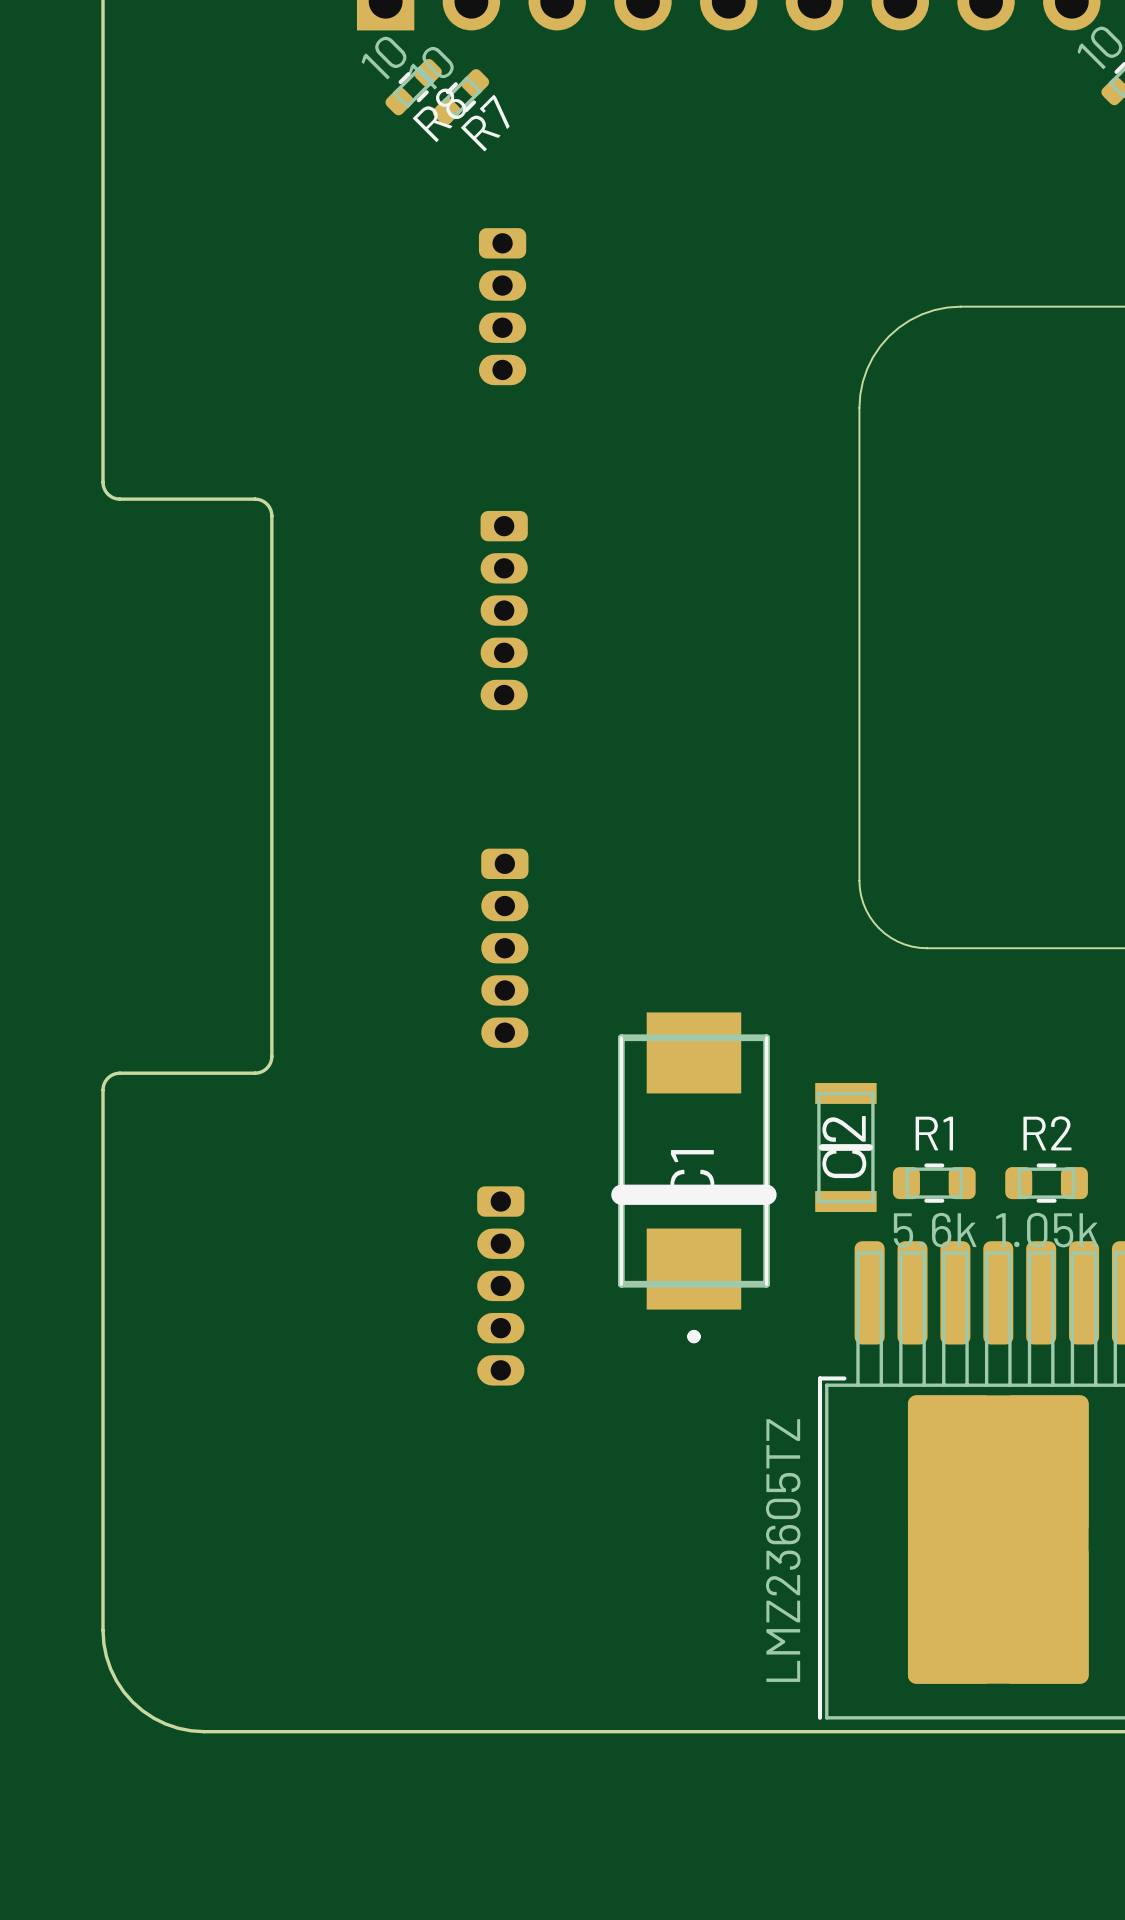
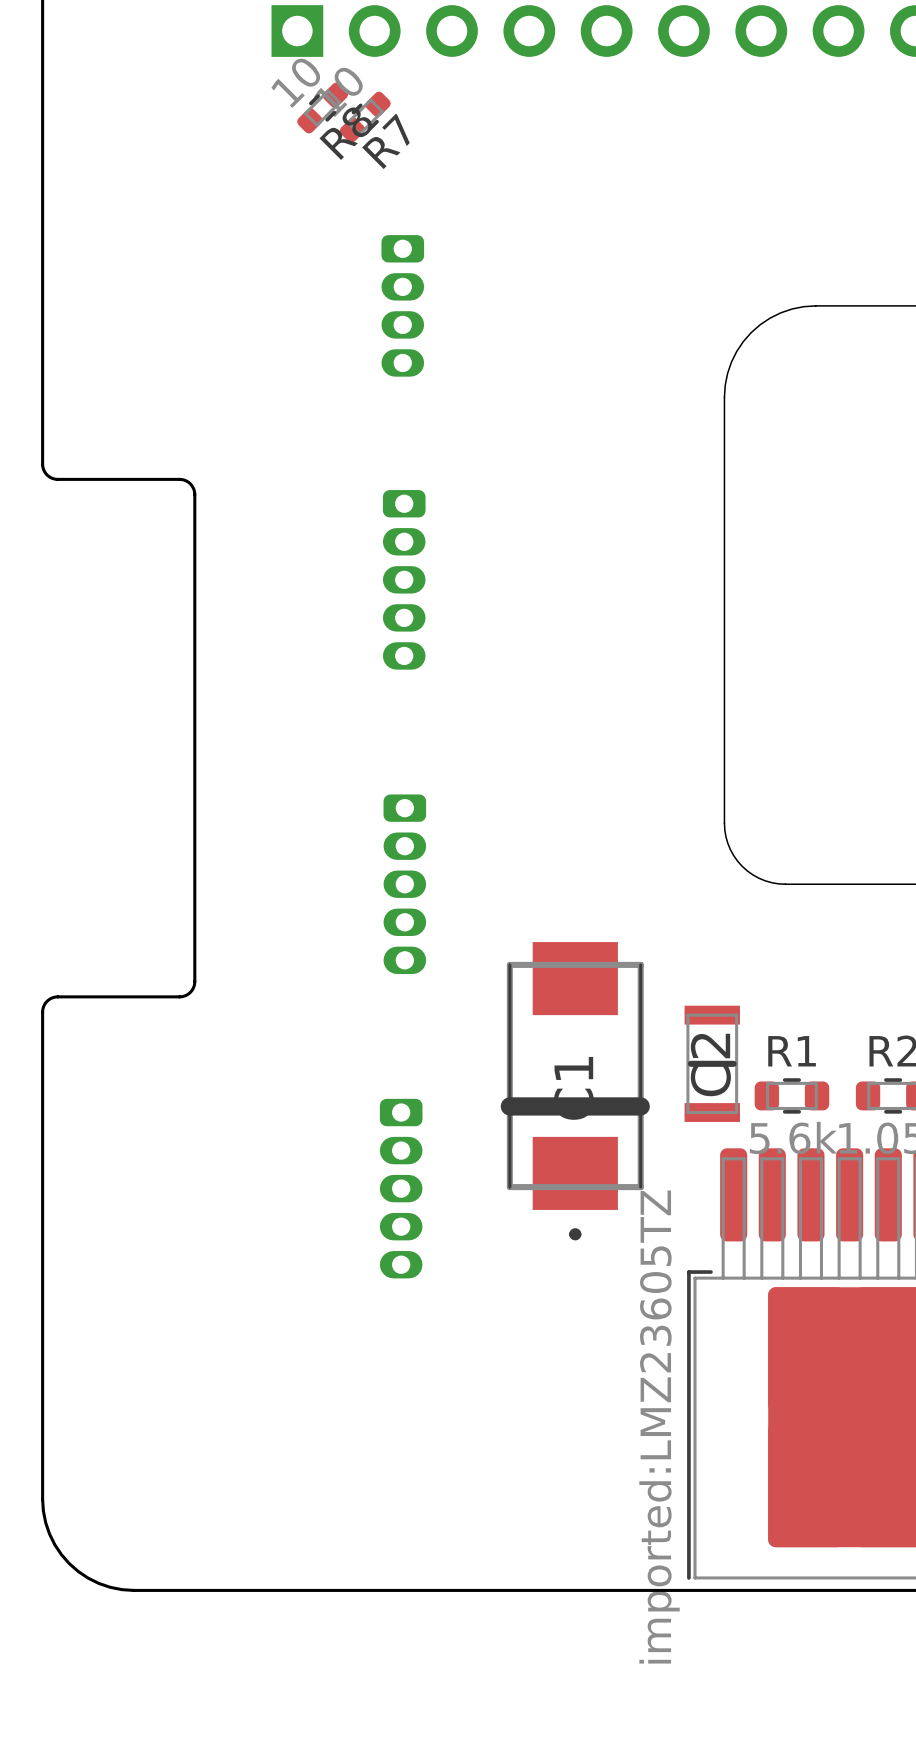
part value: LMZ23605TZ (783, 1550) -> imported:LMZ23605TZ (659, 1427)

